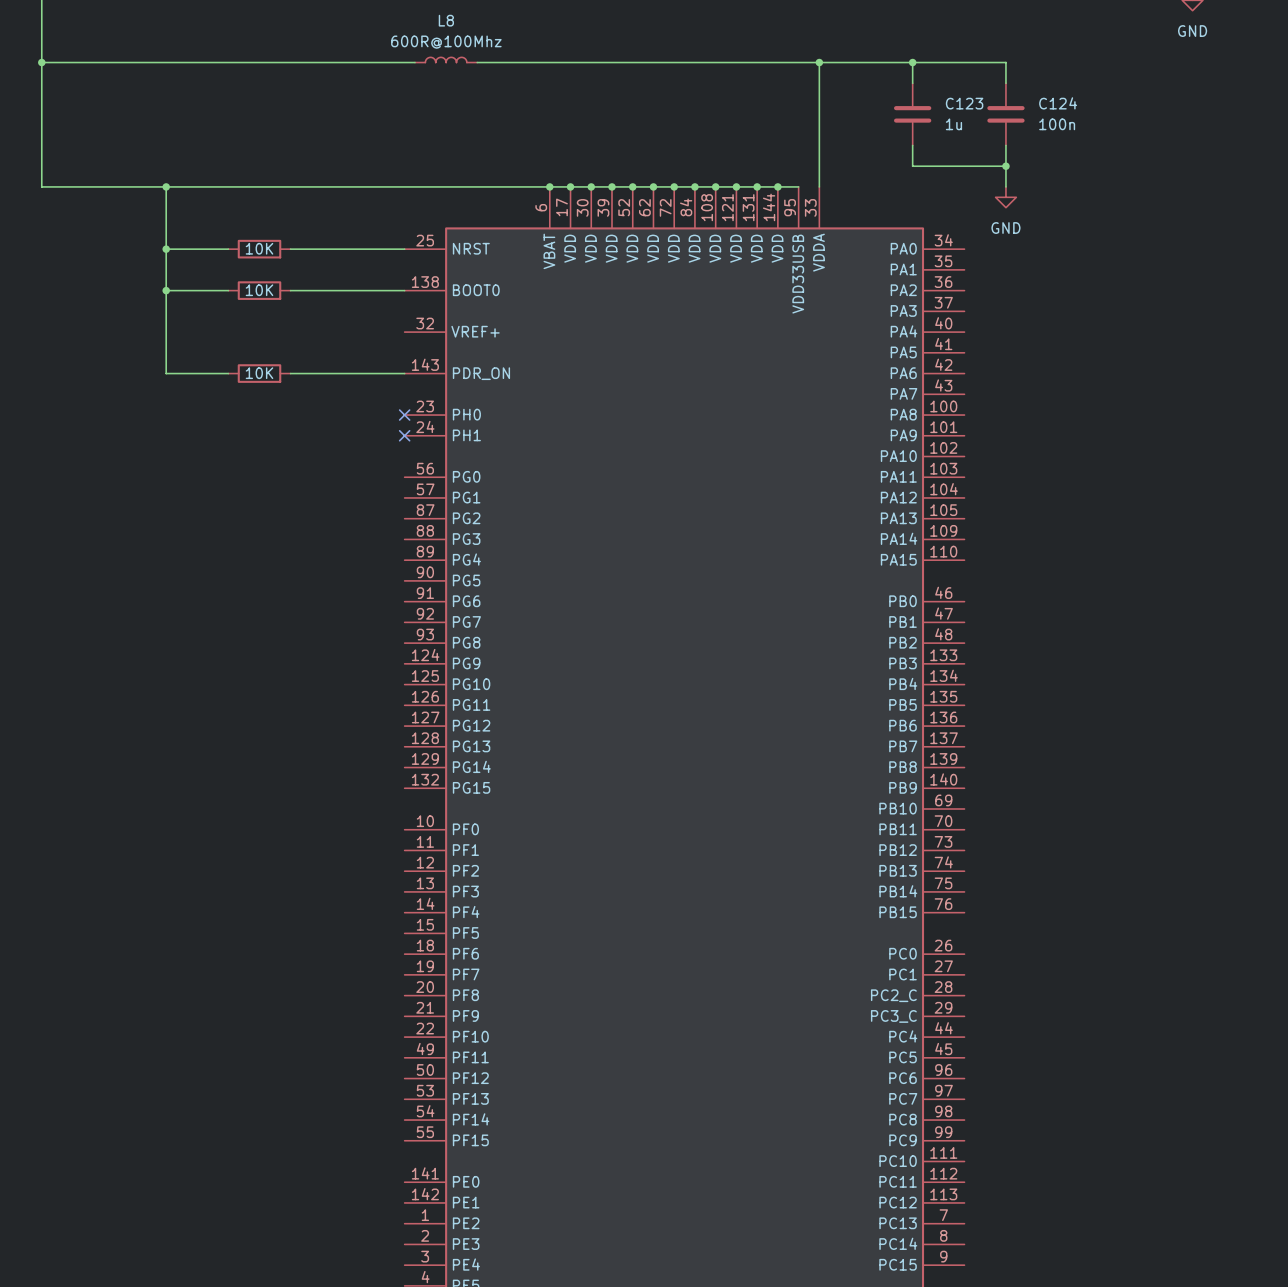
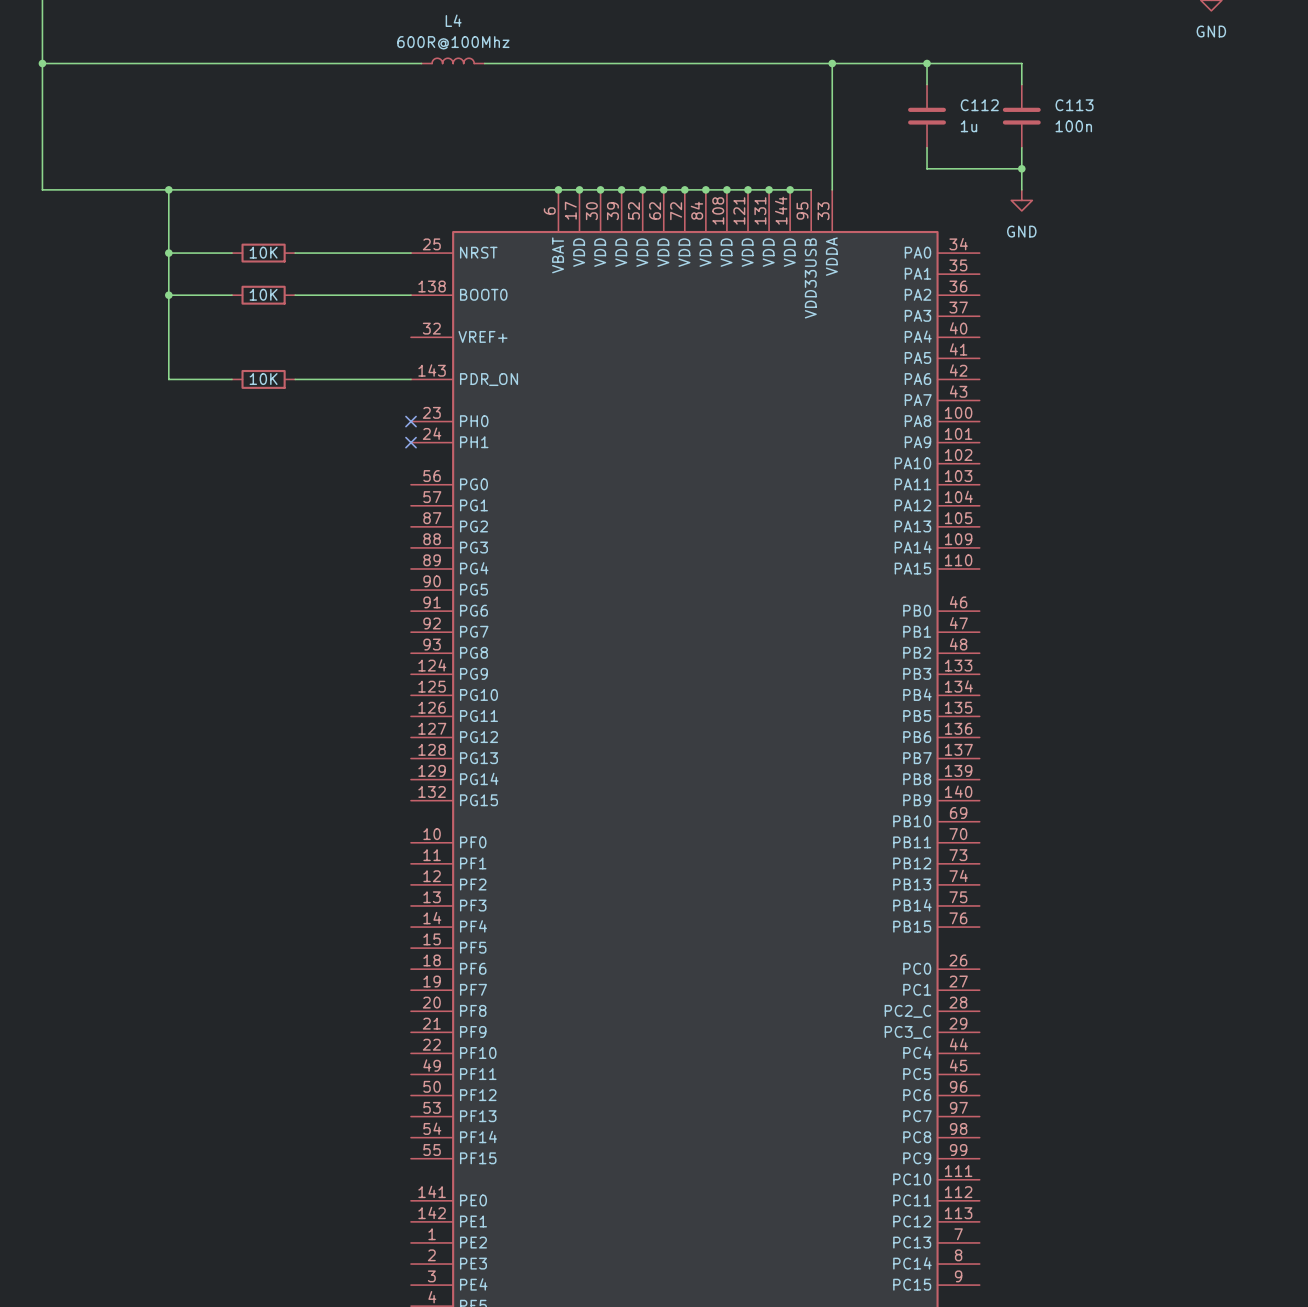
L8 name: L8 (446, 20) -> L4 (453, 20)
C123 name: C123 (964, 103) -> C112 (979, 105)
C124 name: C124 (1058, 103) -> C113 (1074, 105)

